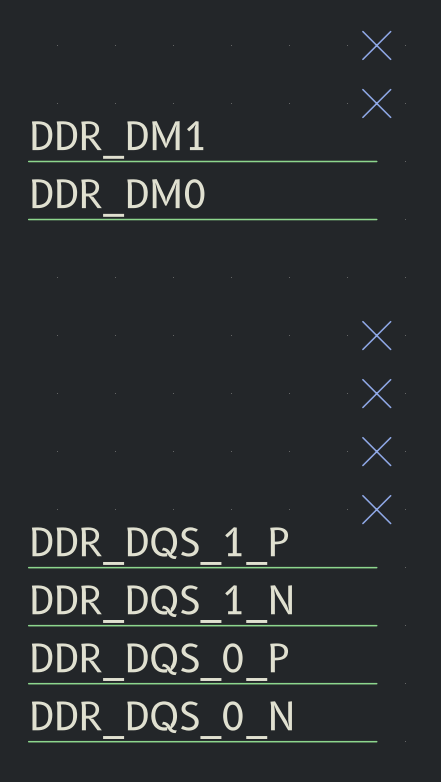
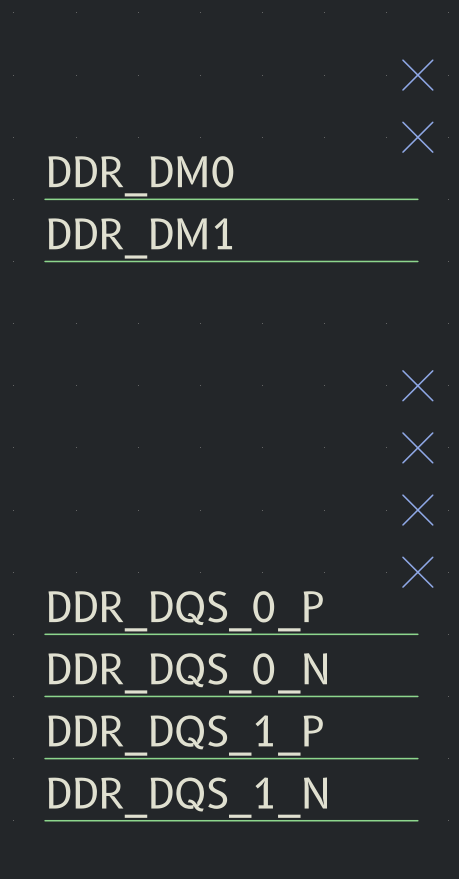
label: DDR_DM1 (117, 139) -> DDR_DM0 (140, 176)
label: DDR_DM0 (118, 197) -> DDR_DM1 (140, 238)
label: DDR_DQS_1_P (159, 546) -> DDR_DQS_0_P (185, 611)
label: DDR_DQS_1_N (161, 604) -> DDR_DQS_0_N (187, 673)
label: DDR_DQS_0_P (159, 662) -> DDR_DQS_1_P (185, 735)
label: DDR_DQS_0_N (161, 720) -> DDR_DQS_1_N (187, 797)

